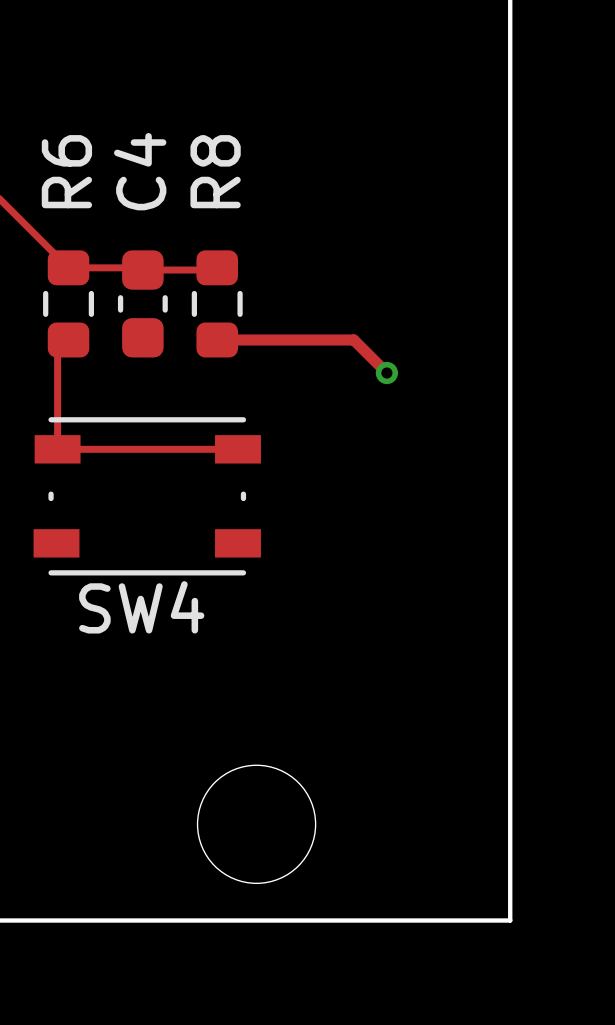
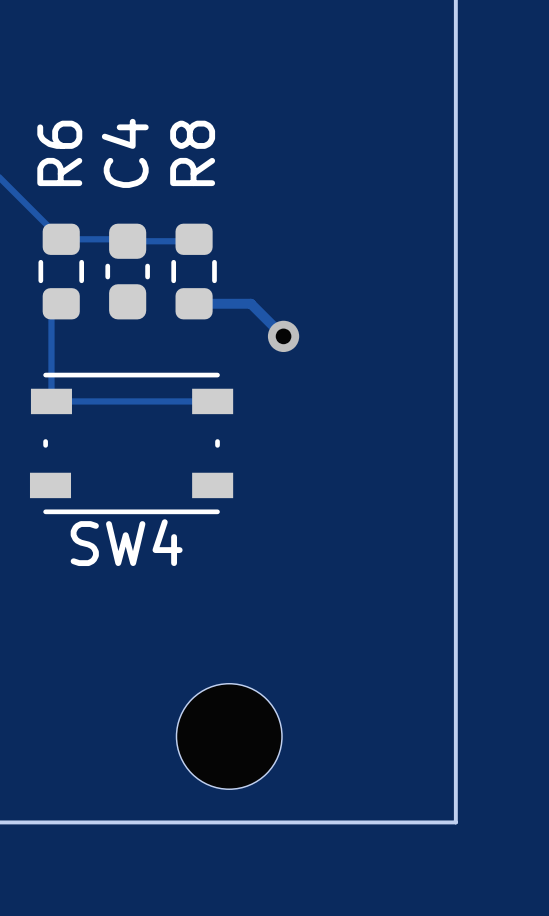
track: (280, 339) (353, 339) (386, 373) -> (250, 303) (283, 336)
via: (386, 373) -> none
via: none -> (283, 336)

